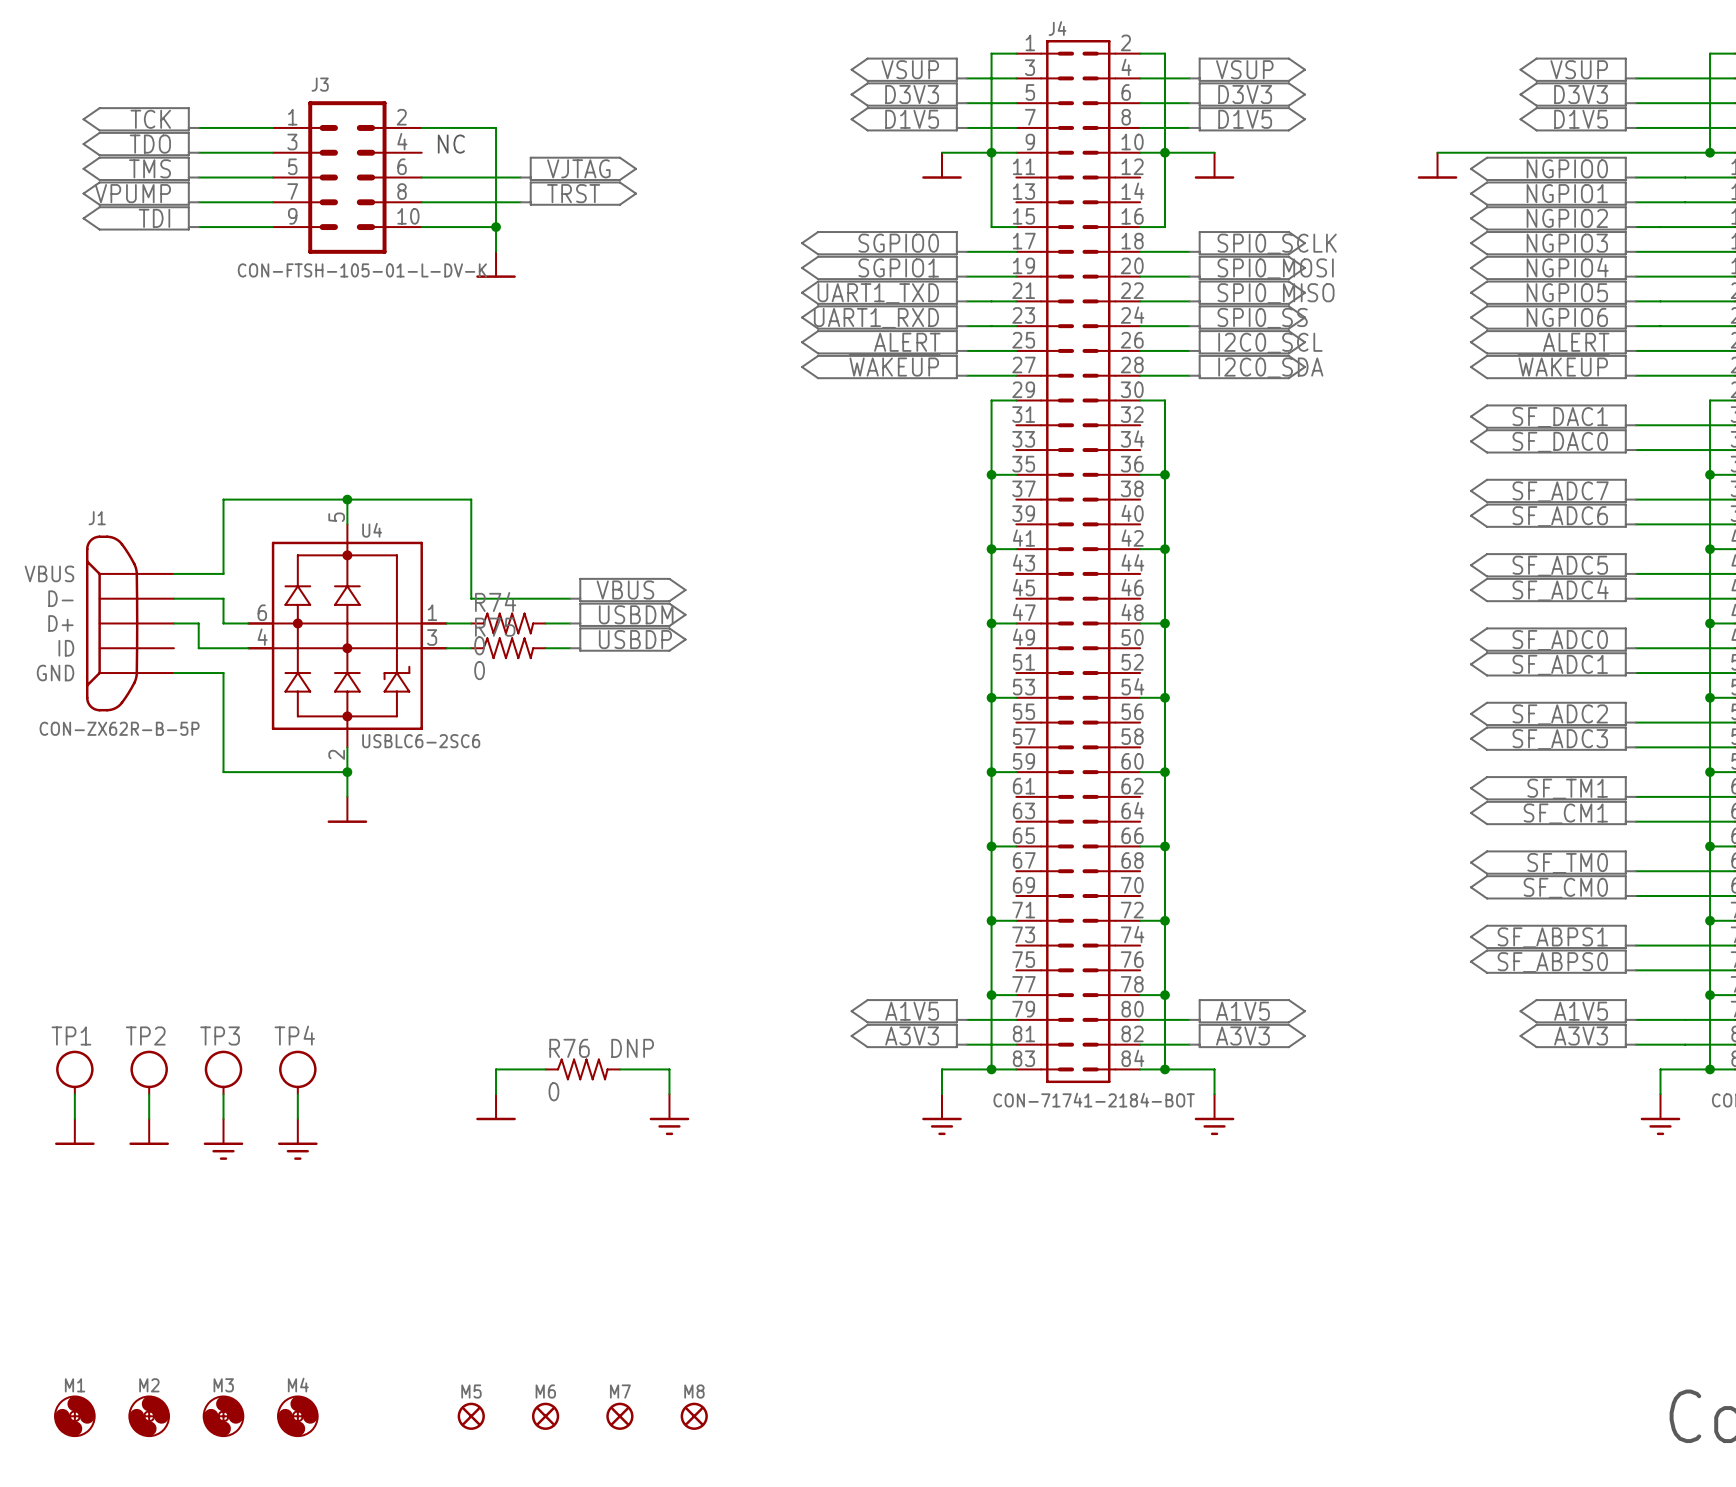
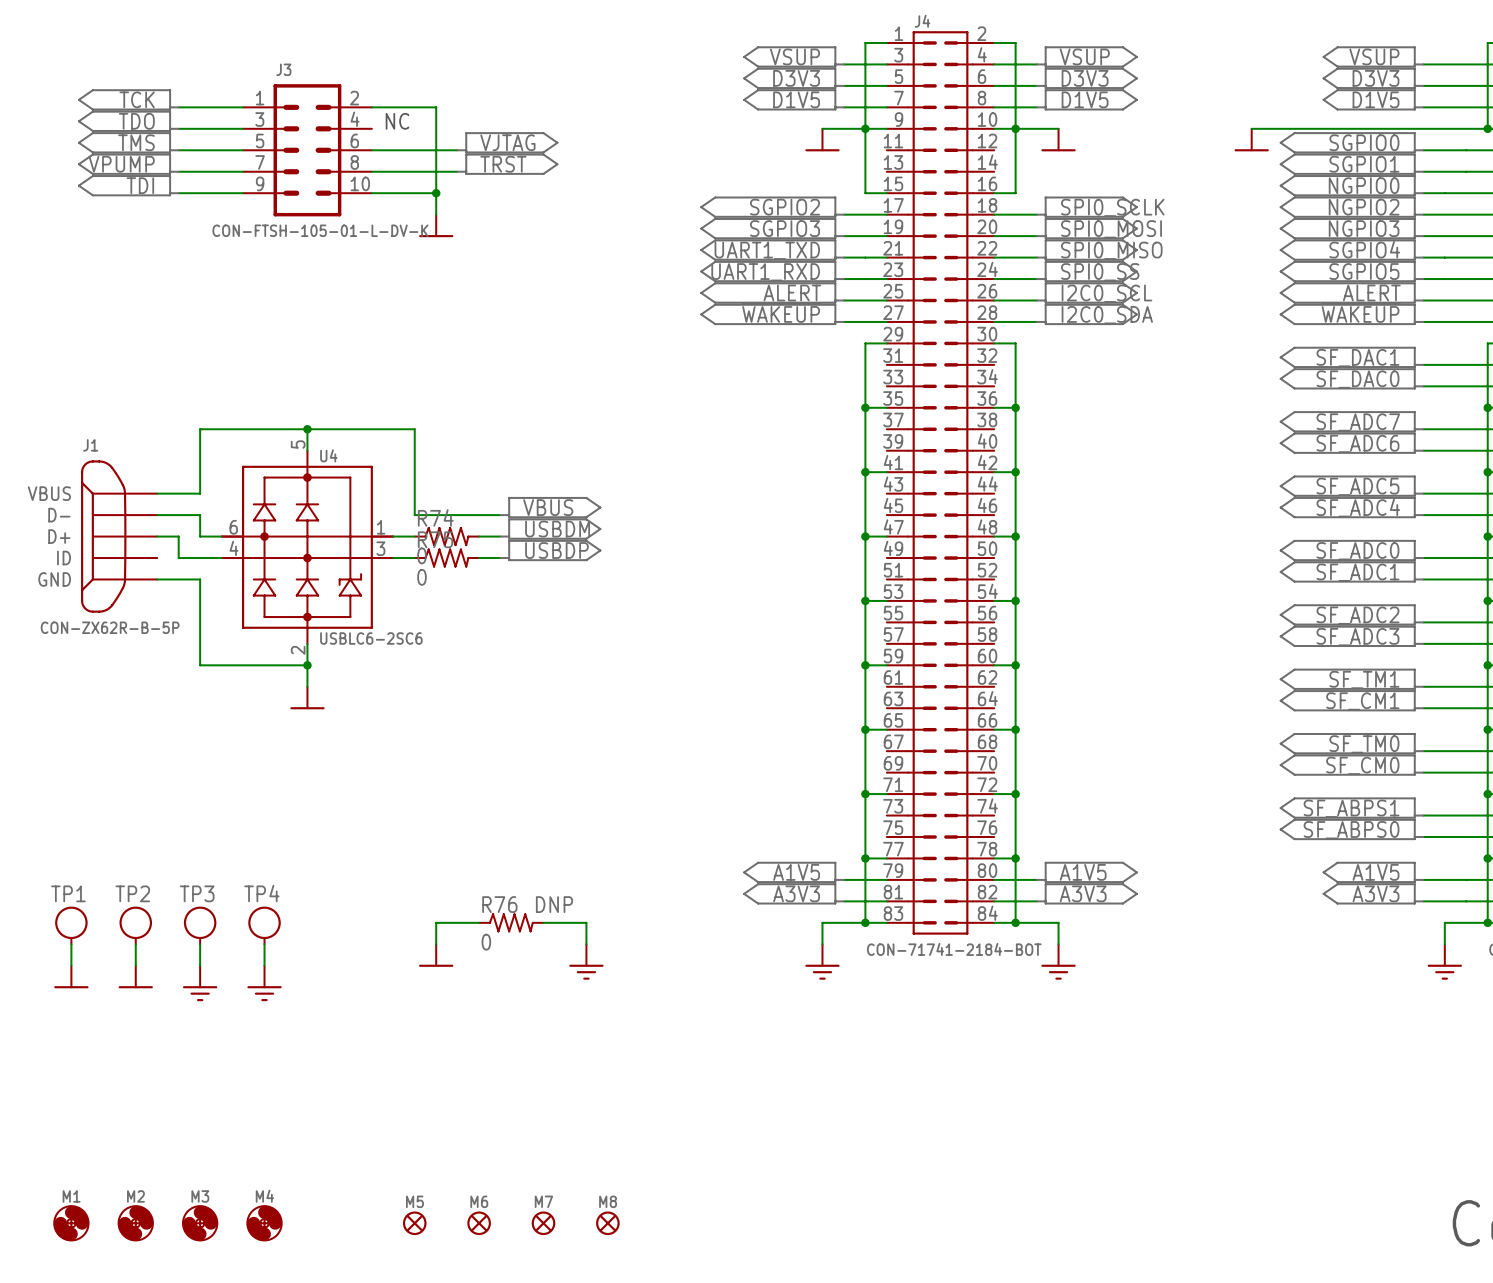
label: NGPIO0 (1567, 168) -> SGPIO0 (1364, 142)
label: NGPIO1 (1567, 193) -> SGPIO1 (1364, 164)
label: NGPIO2 (1567, 218) -> NGPIO0 (1364, 185)
label: SGPIO0 (898, 243) -> SGPIO2 (785, 207)
label: NGPIO3 (1567, 243) -> NGPIO2 (1364, 207)
label: SGPIO1 (898, 267) -> SGPIO3 (785, 228)
label: NGPIO4 (1567, 267) -> NGPIO3 (1364, 228)
label: NGPIO5 (1567, 292) -> SGPIO4 (1364, 249)
label: NGPIO6 (1567, 317) -> SGPIO5 (1364, 271)

